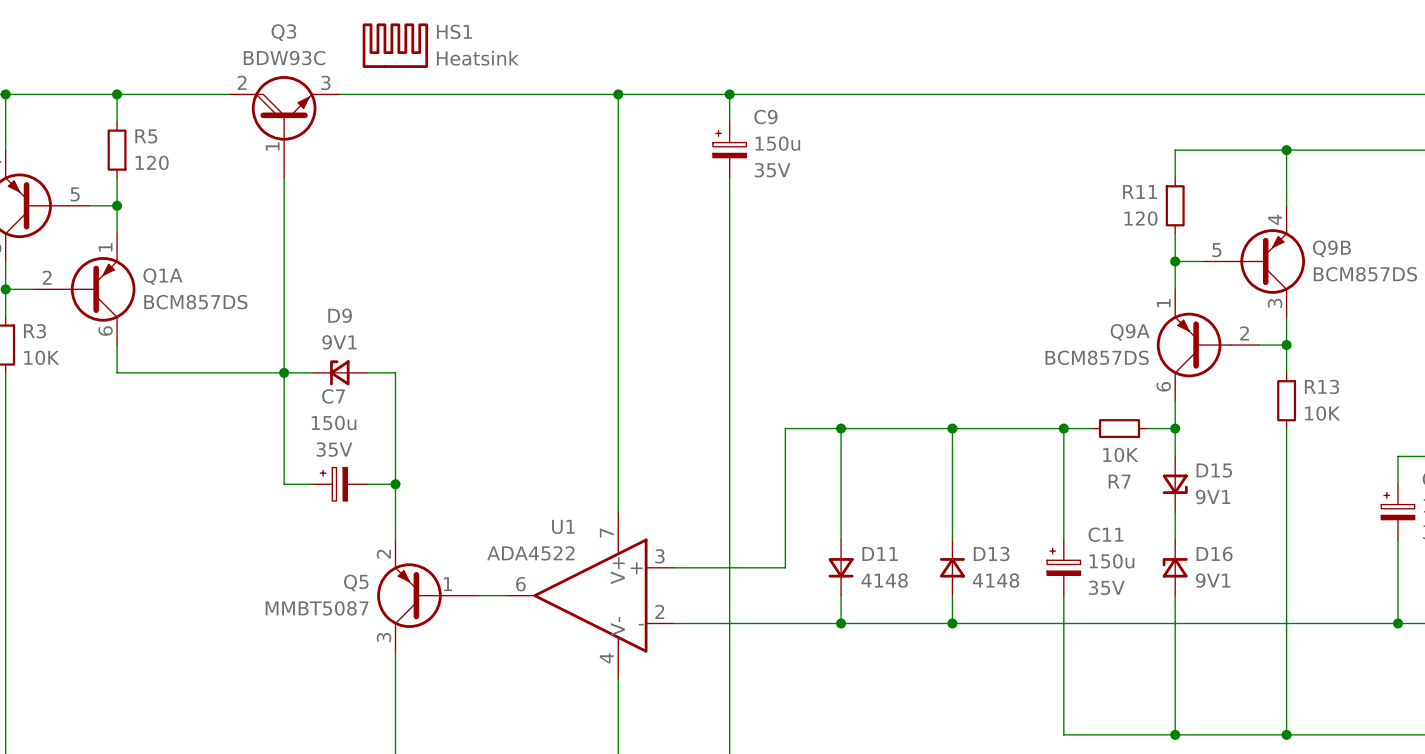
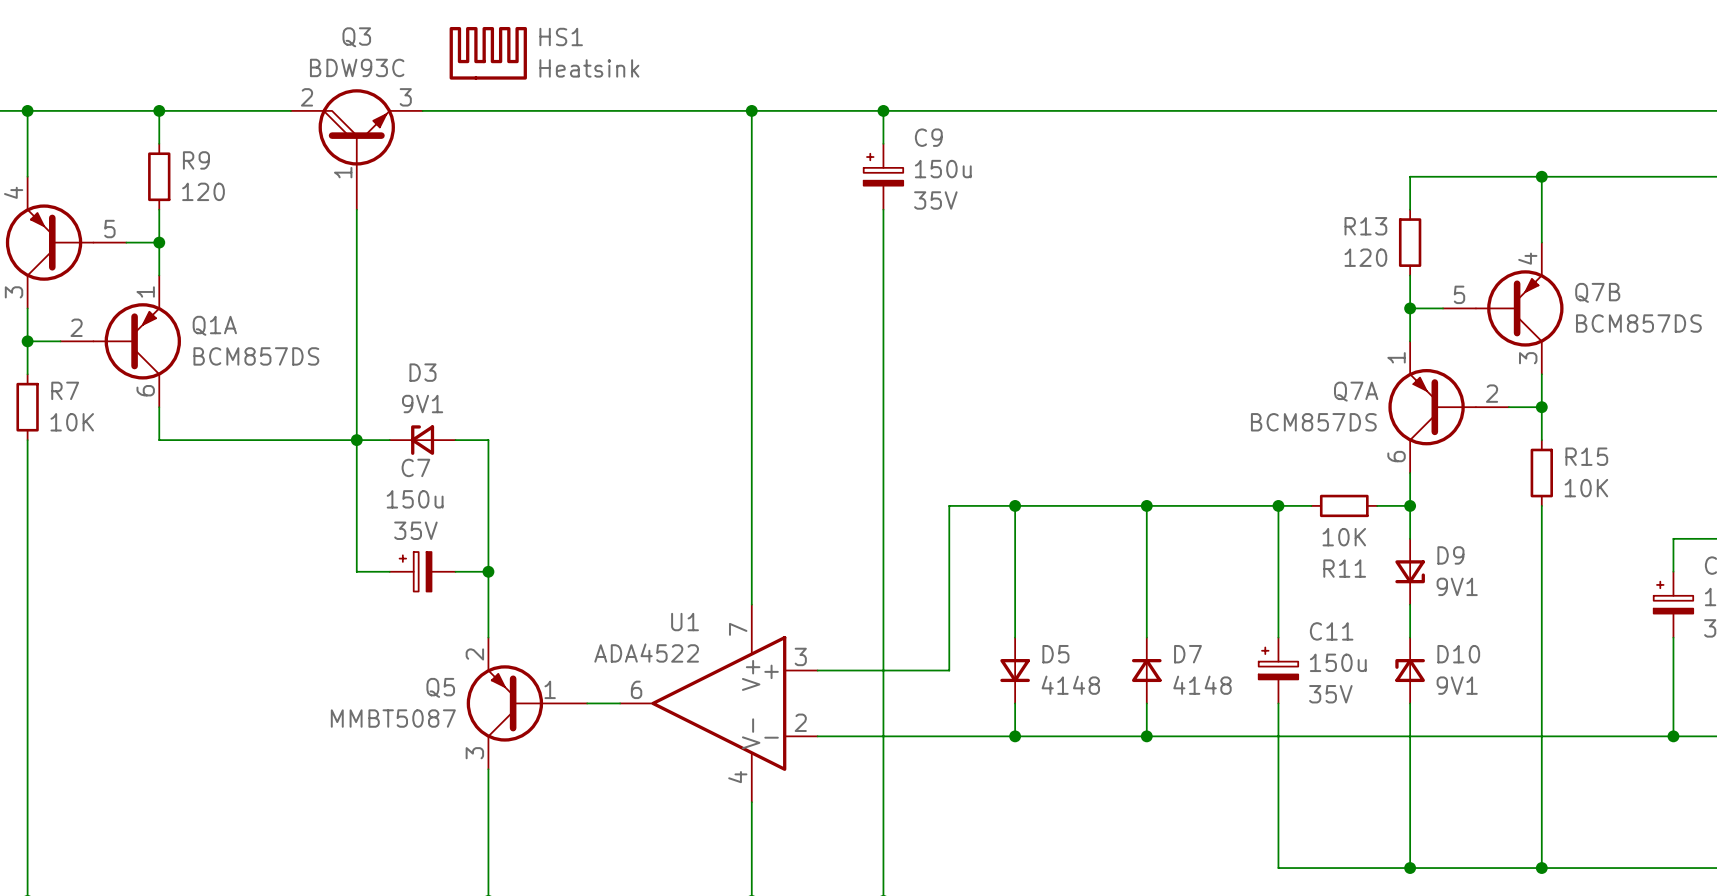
R5 name: R5 (146, 136) -> R9 (196, 160)
R11 name: R11 (1140, 191) -> R13 (1365, 226)
Q9B name: Q9B (1331, 248) -> Q7B (1597, 292)
D9 name: D9 (340, 315) -> D3 (423, 372)
R3 name: R3 (34, 331) -> R7 (65, 390)
Q9A name: Q9A (1130, 332) -> Q7A (1356, 391)
R13 name: R13 (1321, 386) -> R15 (1586, 456)
D15 name: D15 (1214, 470) -> D9 (1450, 555)
R7 name: R7 (1119, 481) -> R11 (1344, 568)
D11 name: D11 (880, 553) -> D5 (1055, 654)
D13 name: D13 (991, 554) -> D7 (1187, 654)
D16 name: D16 (1214, 554) -> D10 (1458, 654)

